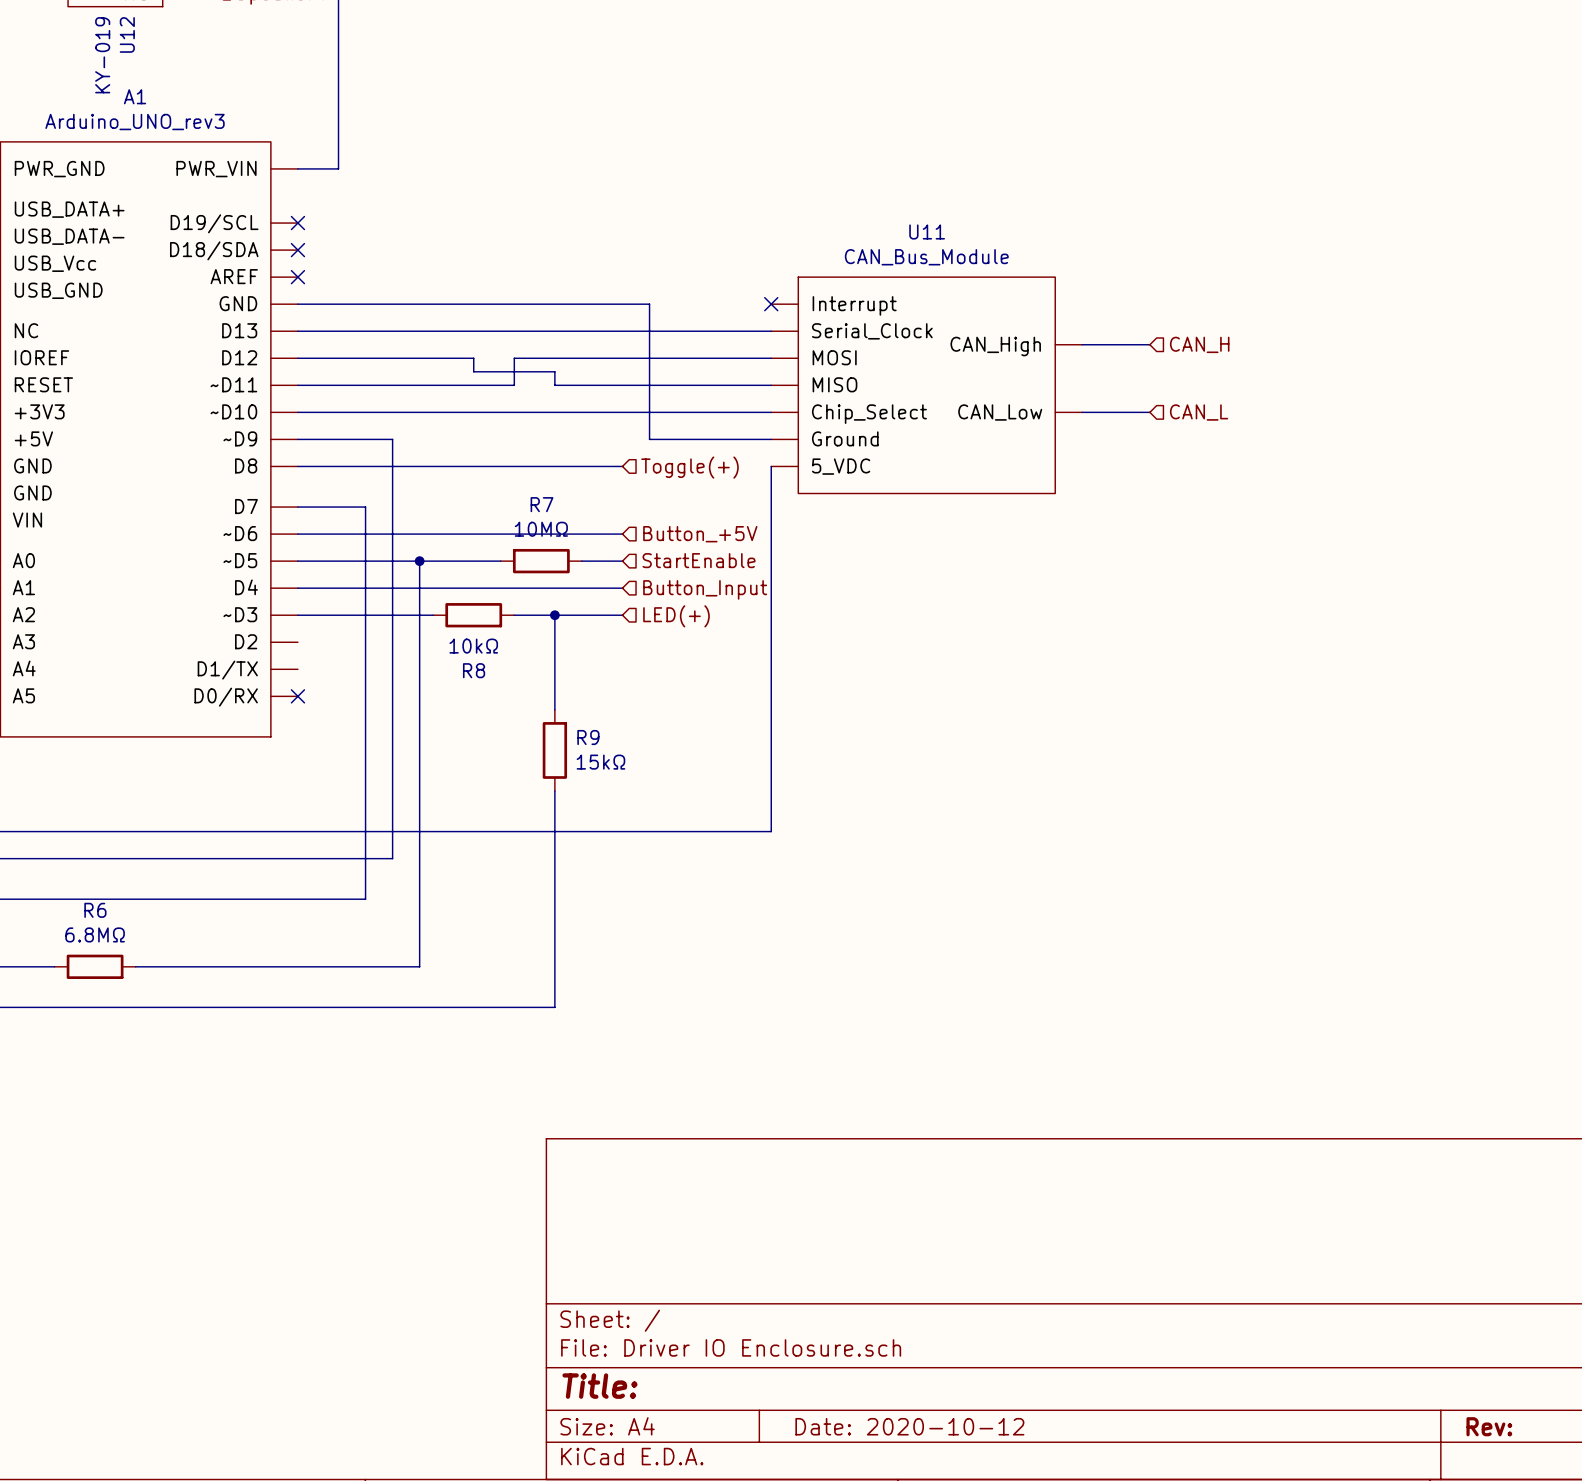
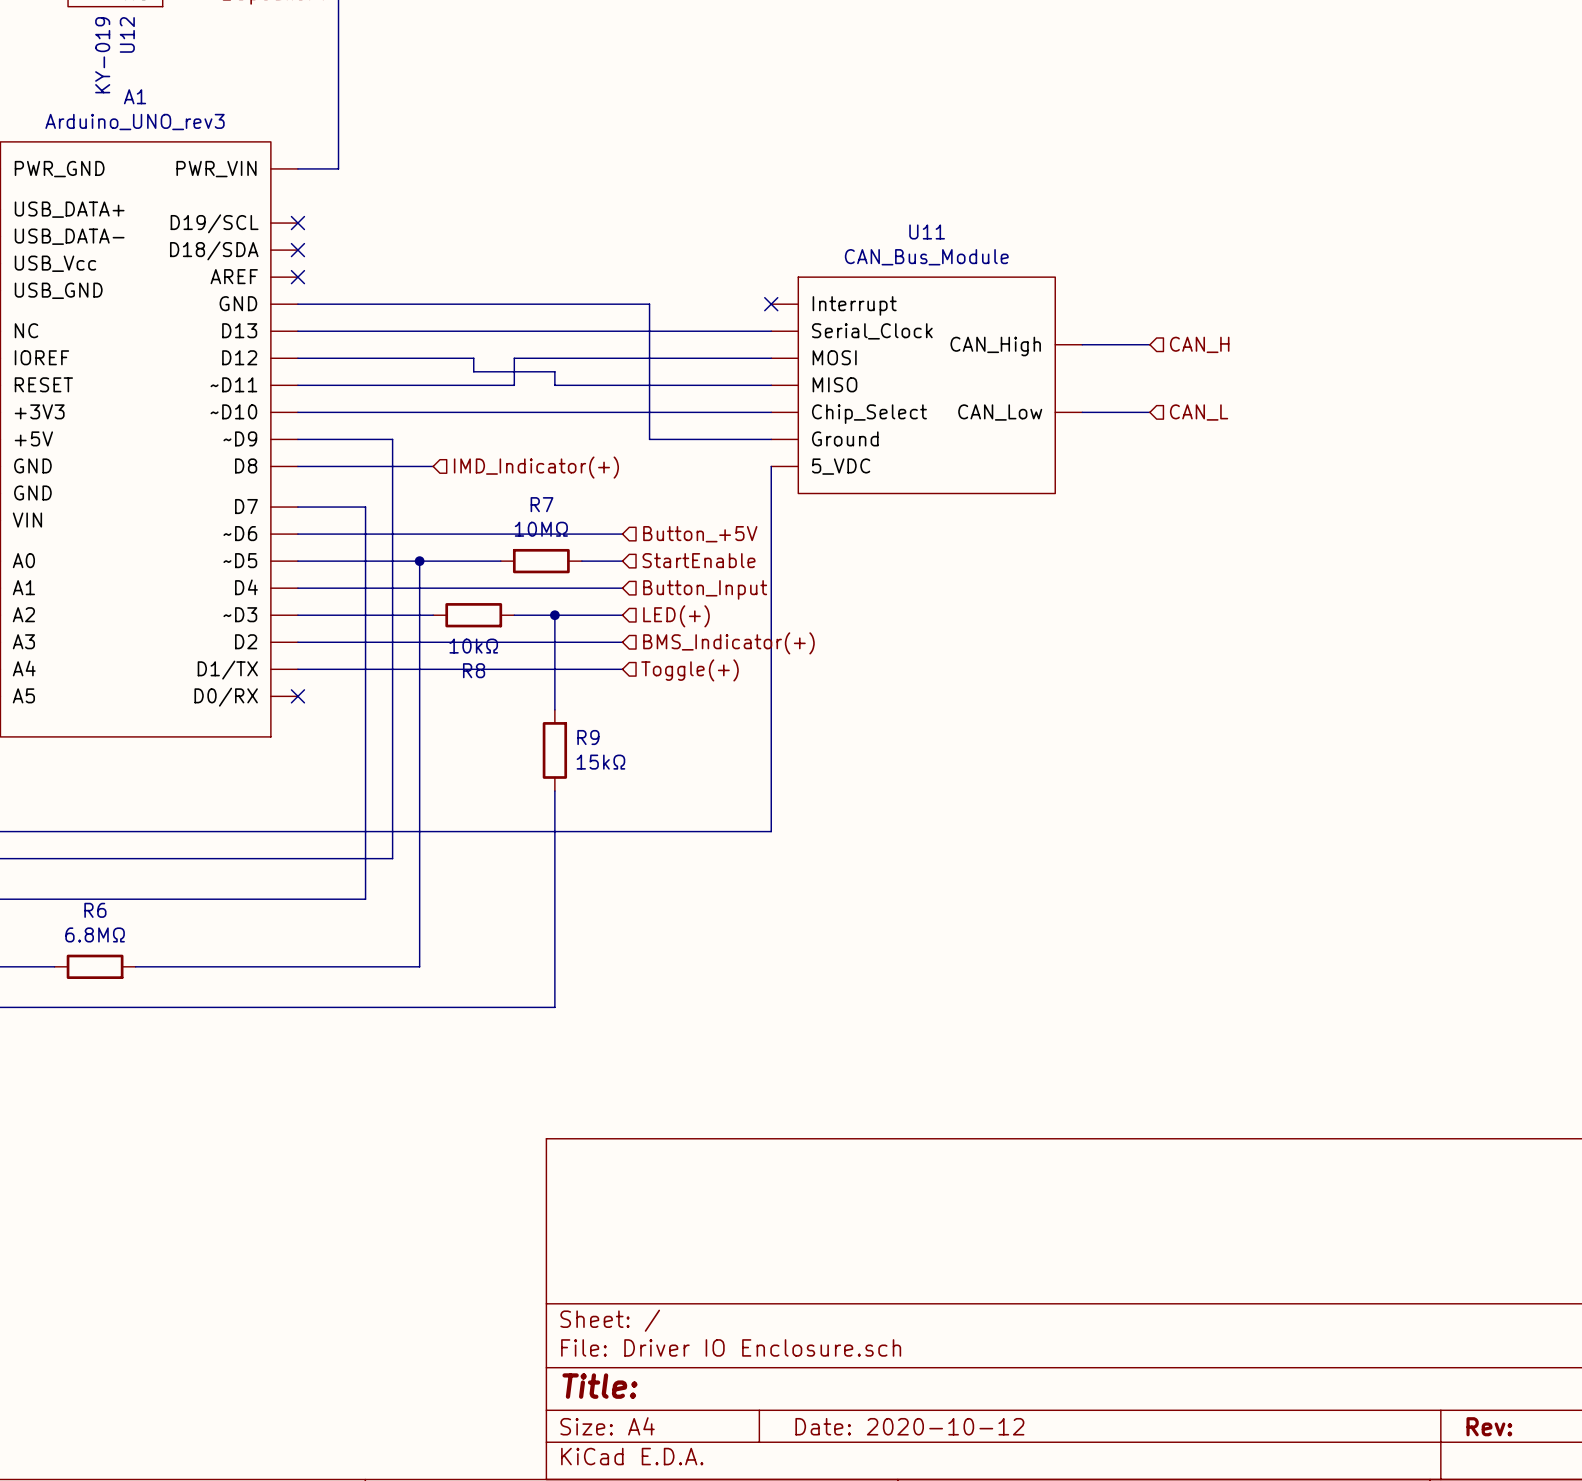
wire: (433, 466) (622, 466) -> none
hierarchical label: none -> IMD_Indicator(+) (536, 467)
hierarchical label position: Toggle(+) (690, 467) -> Toggle(+) (690, 670)
wire: none -> (297, 642) (622, 642)
hierarchical label: none -> BMS_Indicator(+) (728, 643)
wire: none -> (297, 669) (622, 669)

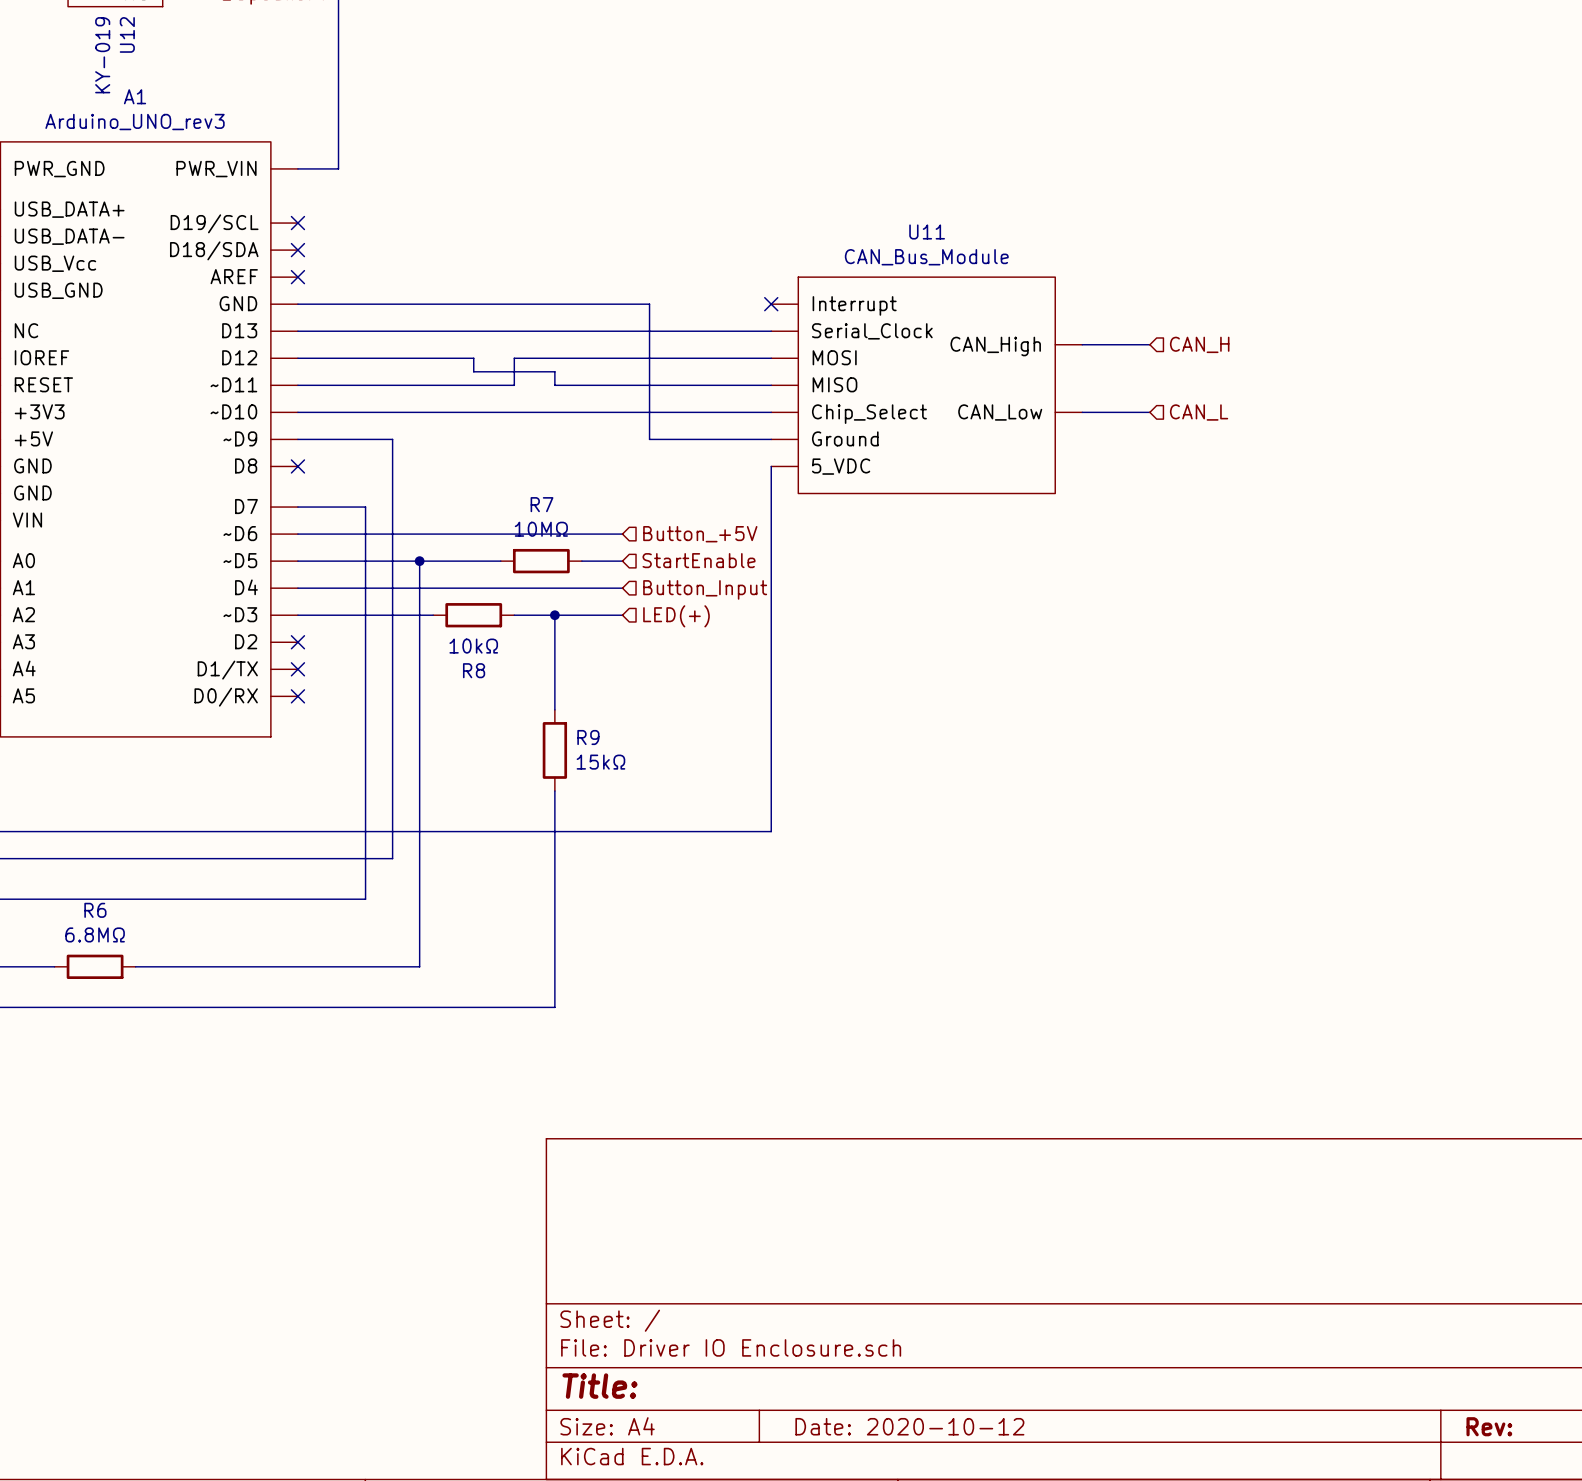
wire: (297, 466) (433, 466) -> none
no-connect mark: none -> (297, 466)
hierarchical label: IMD_Indicator(+) (536, 467) -> none
wire: (297, 642) (622, 642) -> none
no-connect mark: none -> (297, 642)
hierarchical label: BMS_Indicator(+) (728, 643) -> none
wire: (297, 669) (622, 669) -> none
no-connect mark: none -> (297, 669)
hierarchical label: Toggle(+) (690, 670) -> none

